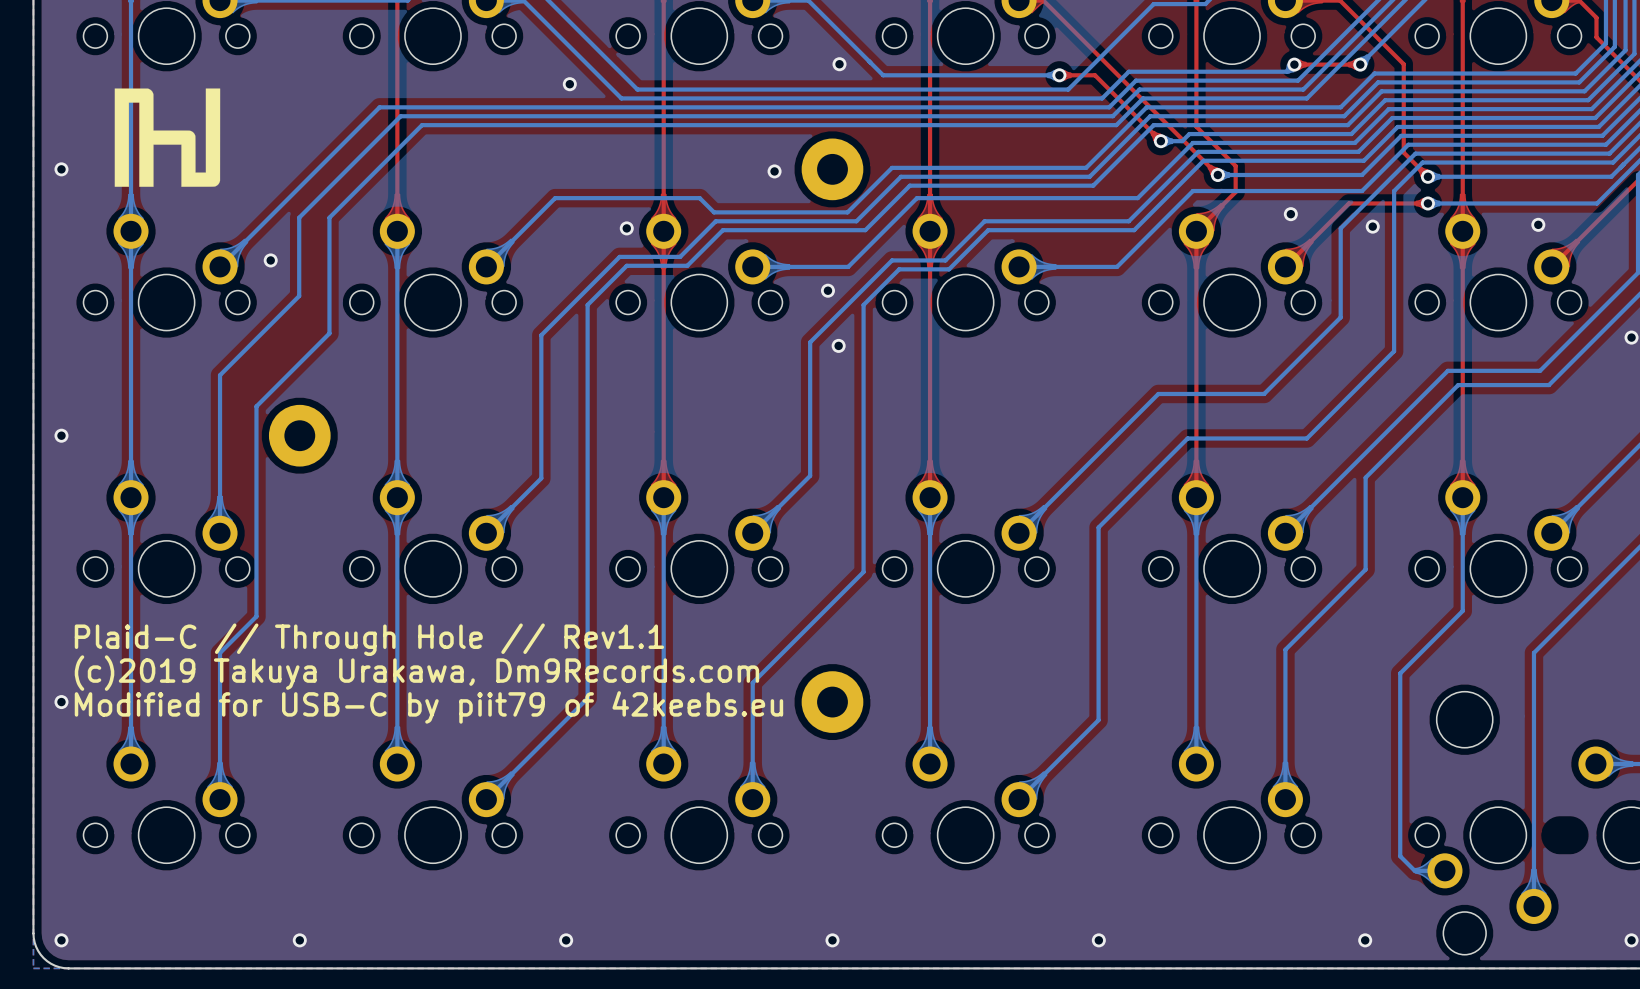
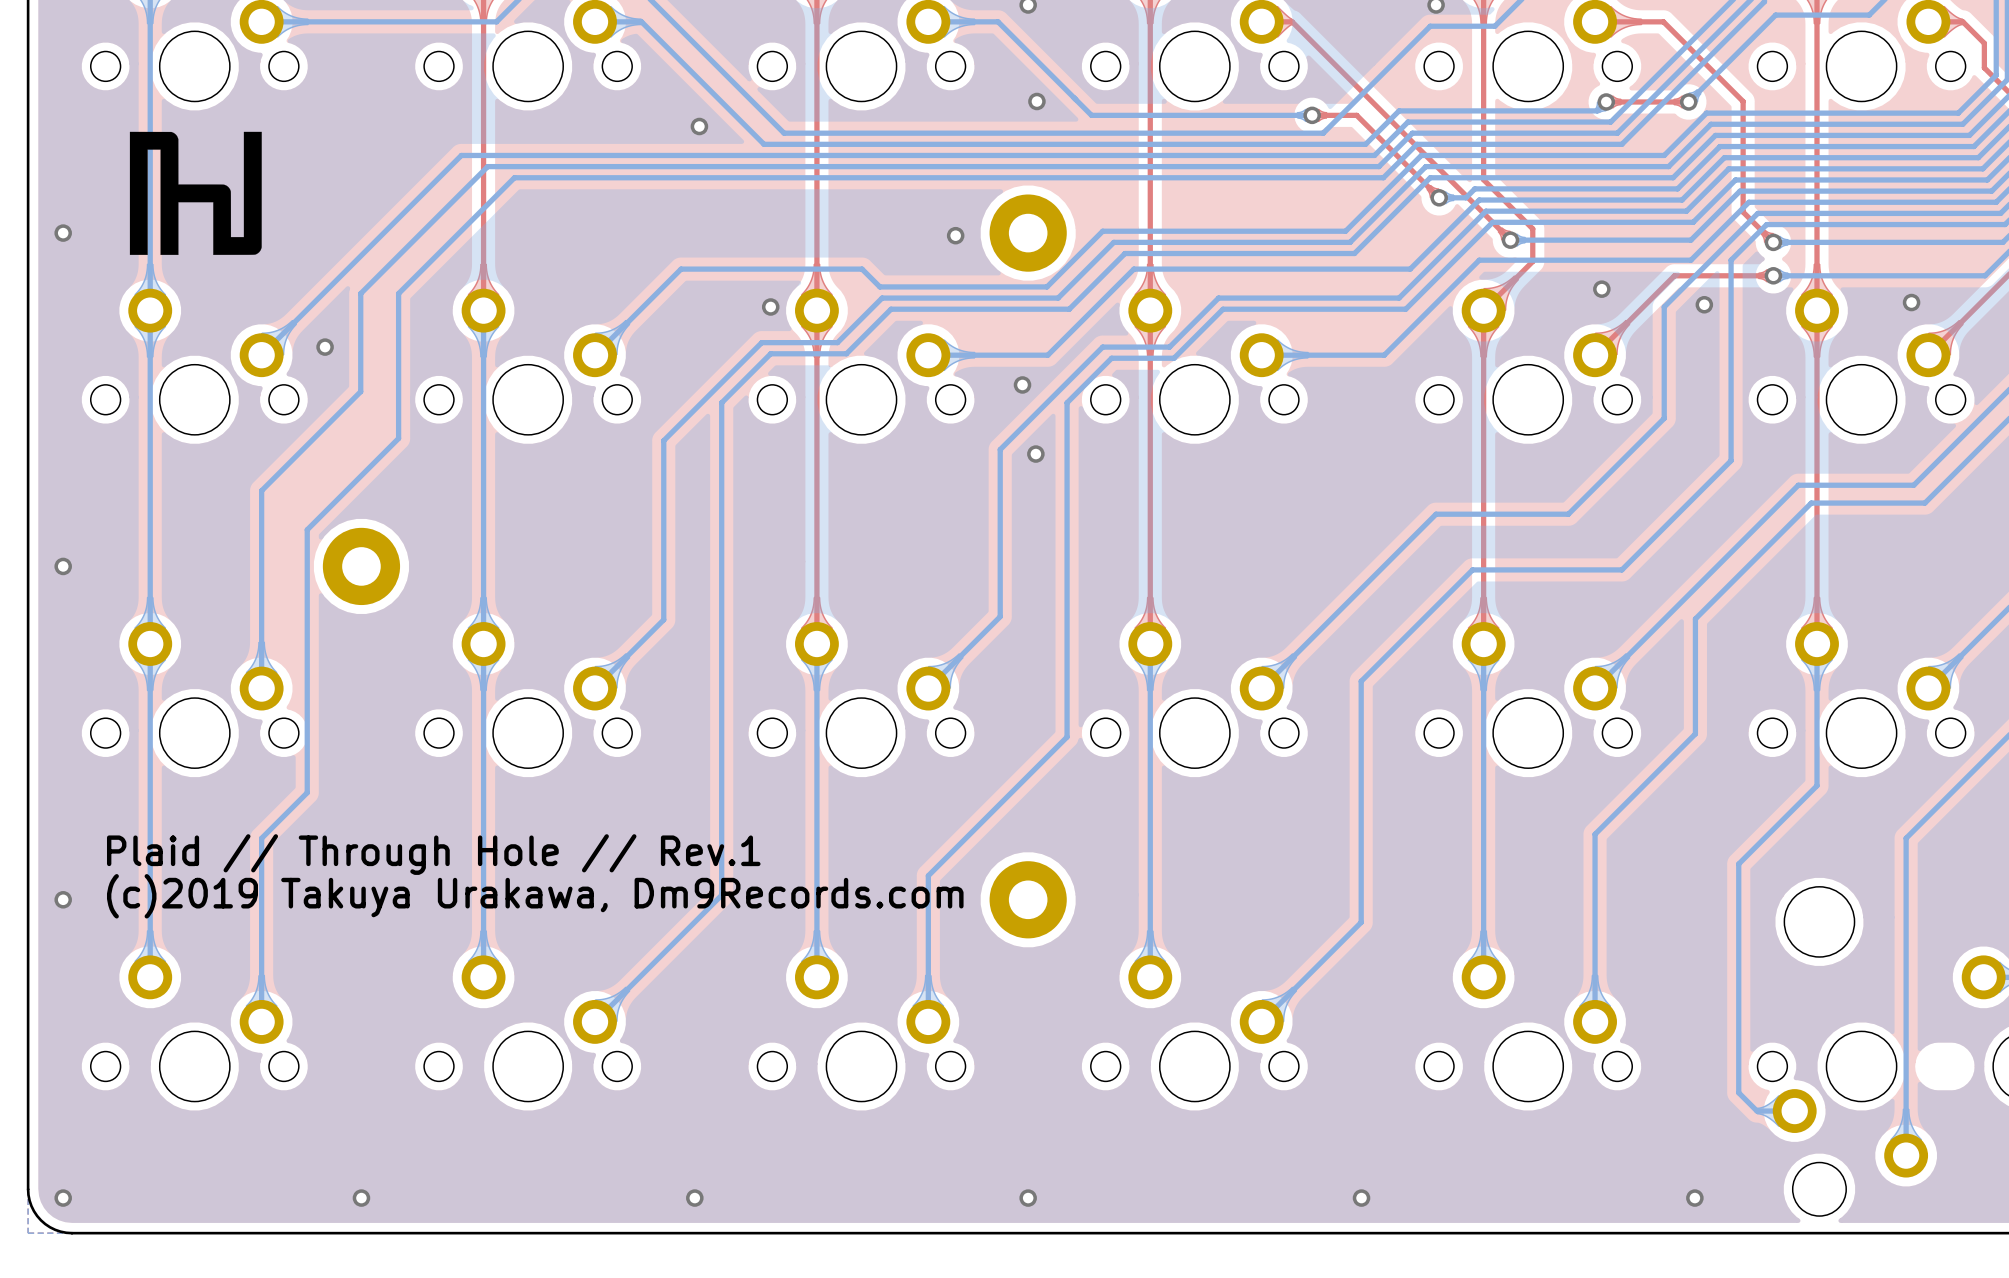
text: Plaid-C // Through Hole // Rev1.1 (369, 639) -> Plaid // Through Hole // Rev.1 (433, 854)
text position: (c)2019 Takuya Urakawa, Dm9Records.com (416, 673) -> (c)2019 Takuya Urakawa, Dm9Records.com (535, 896)
text: Modified for USB-C by piit79 of 42keebs.eu (428, 707) -> none

